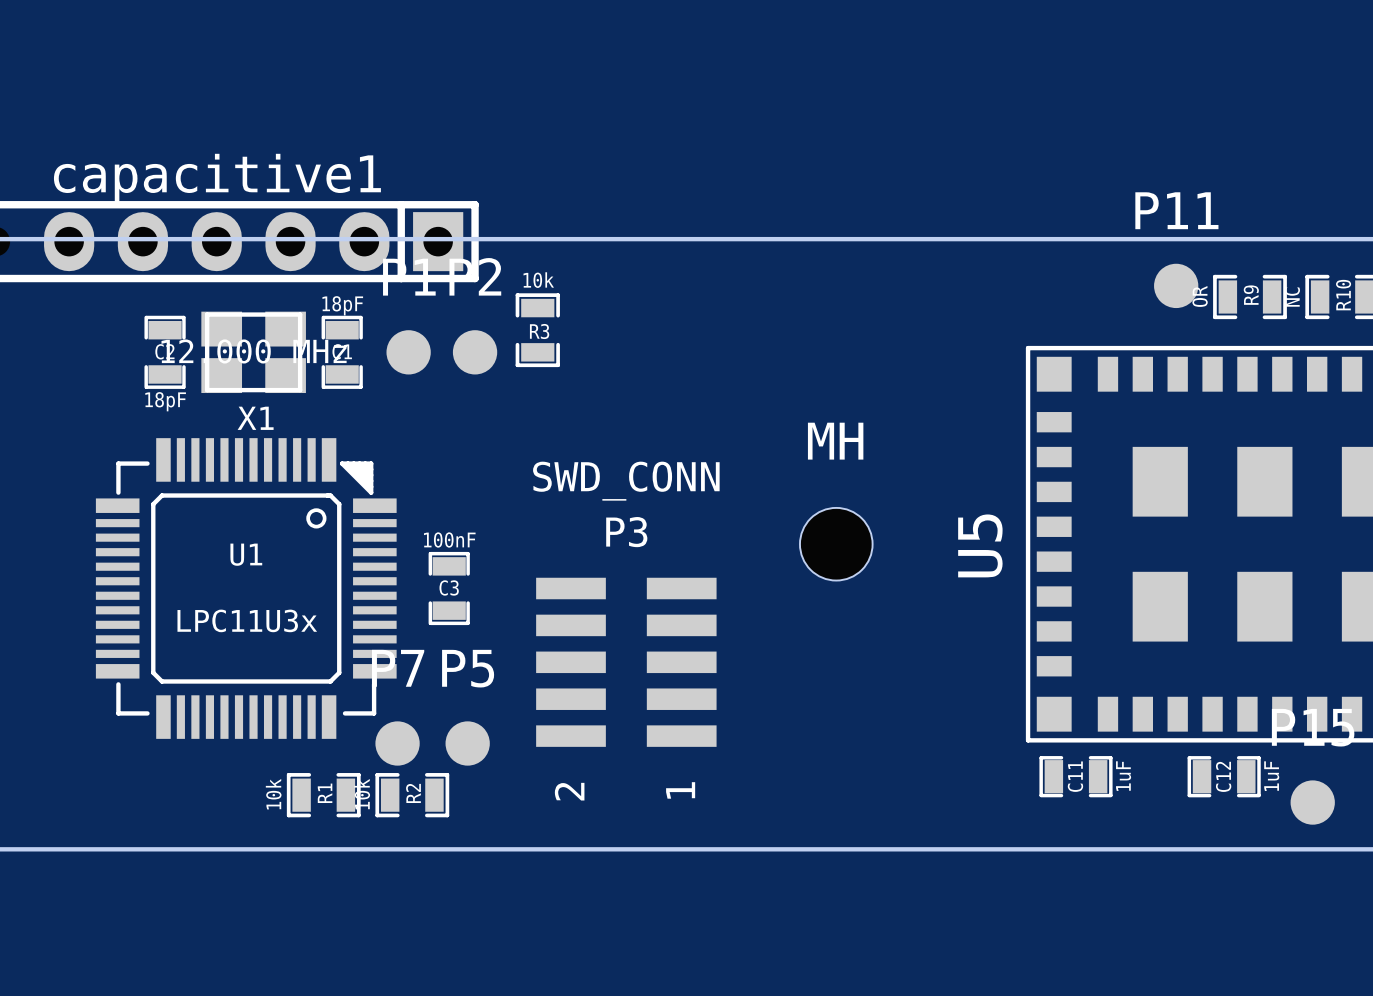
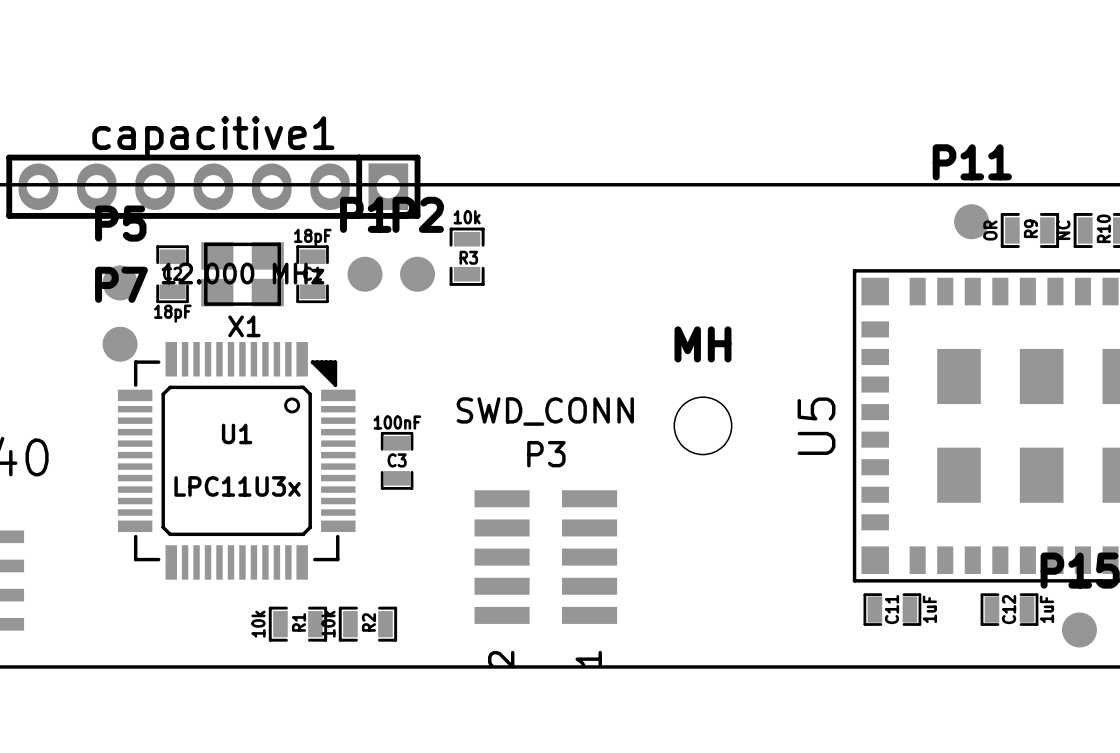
P3 position: (626, 662) -> (545, 557)
P7 position: (397, 743) -> (120, 344)
P5 position: (467, 743) -> (120, 282)

